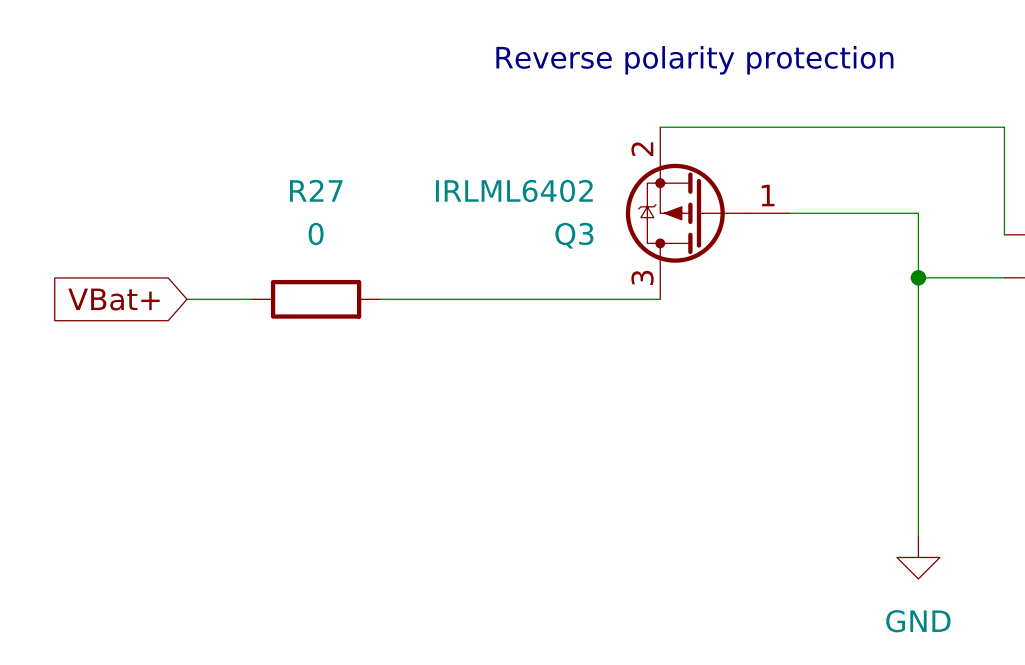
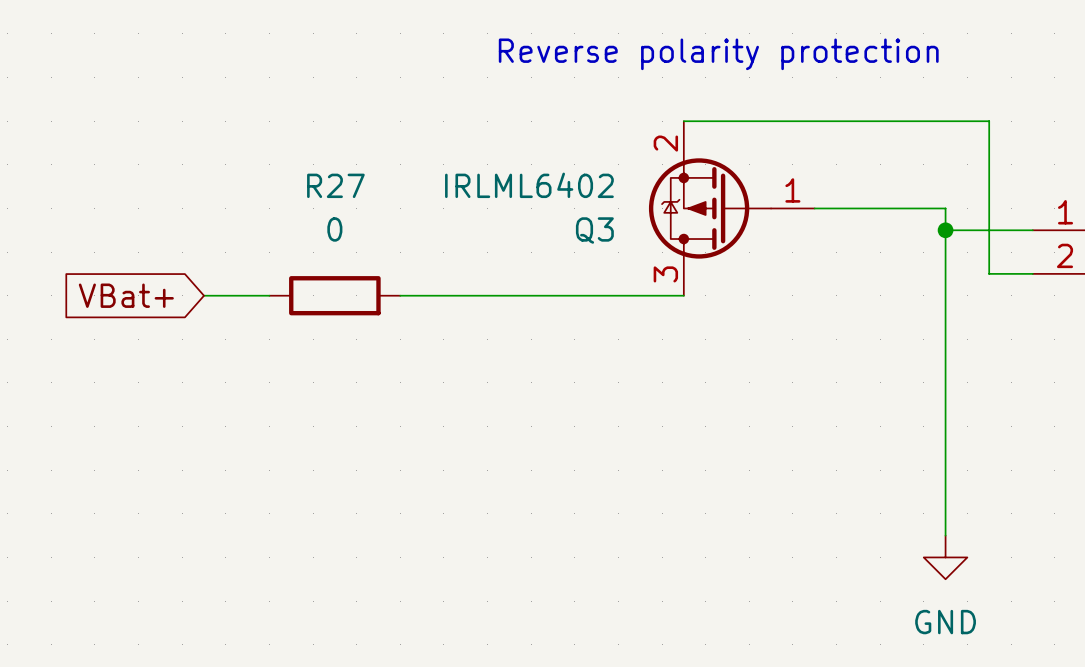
wire: (961, 127) (1004, 127) (1004, 234) -> (989, 121) (989, 273)
wire: none -> (945, 230) (1032, 230)
wire: (918, 277) (961, 277) -> none
junction position: (918, 277) -> (945, 230)

